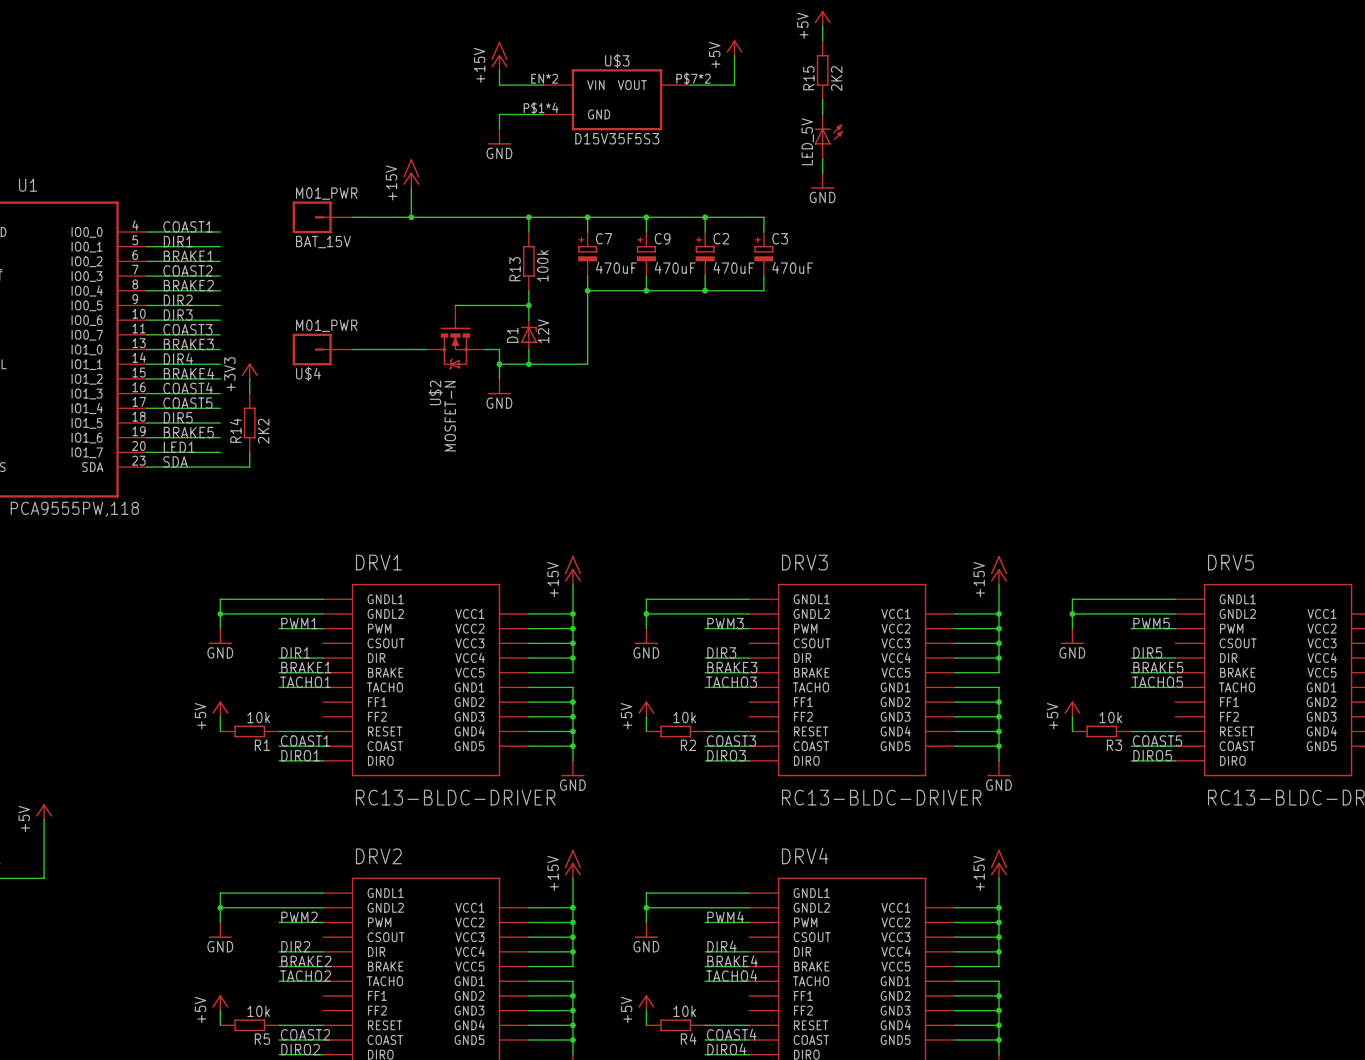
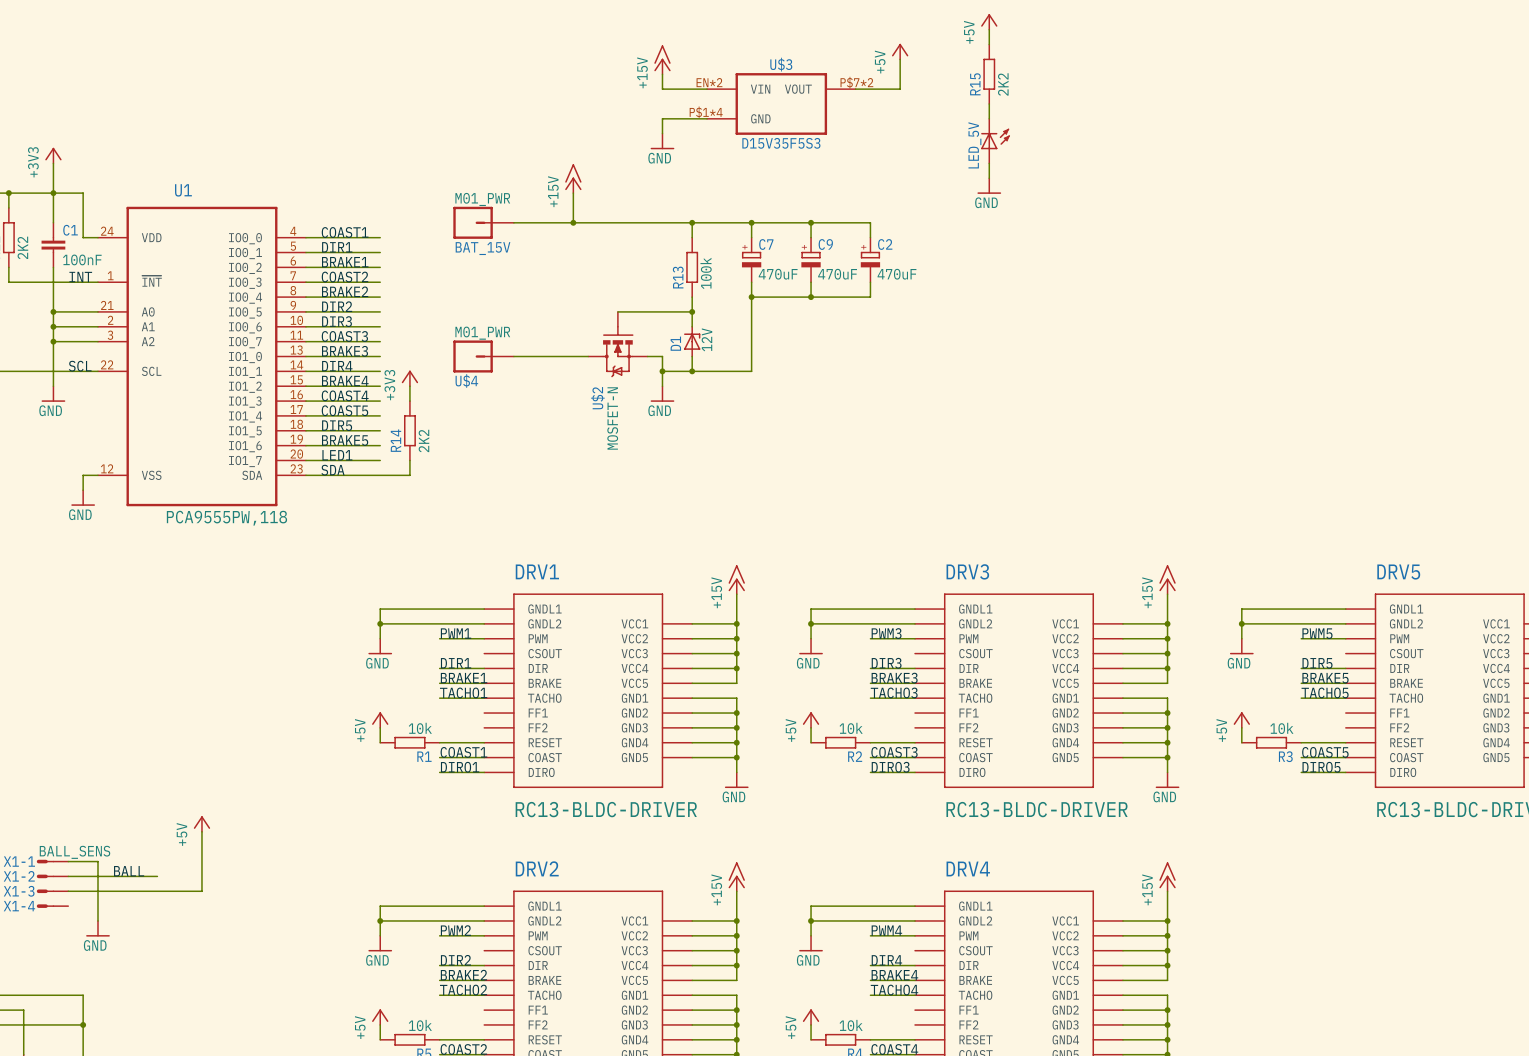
wire: (705, 217) (763, 217) (763, 232) -> none
junction: (705, 217) -> none
C3: 470uF (763, 254) -> none
wire: (763, 276) (763, 290) (705, 290) -> none
junction: (705, 290) -> none

